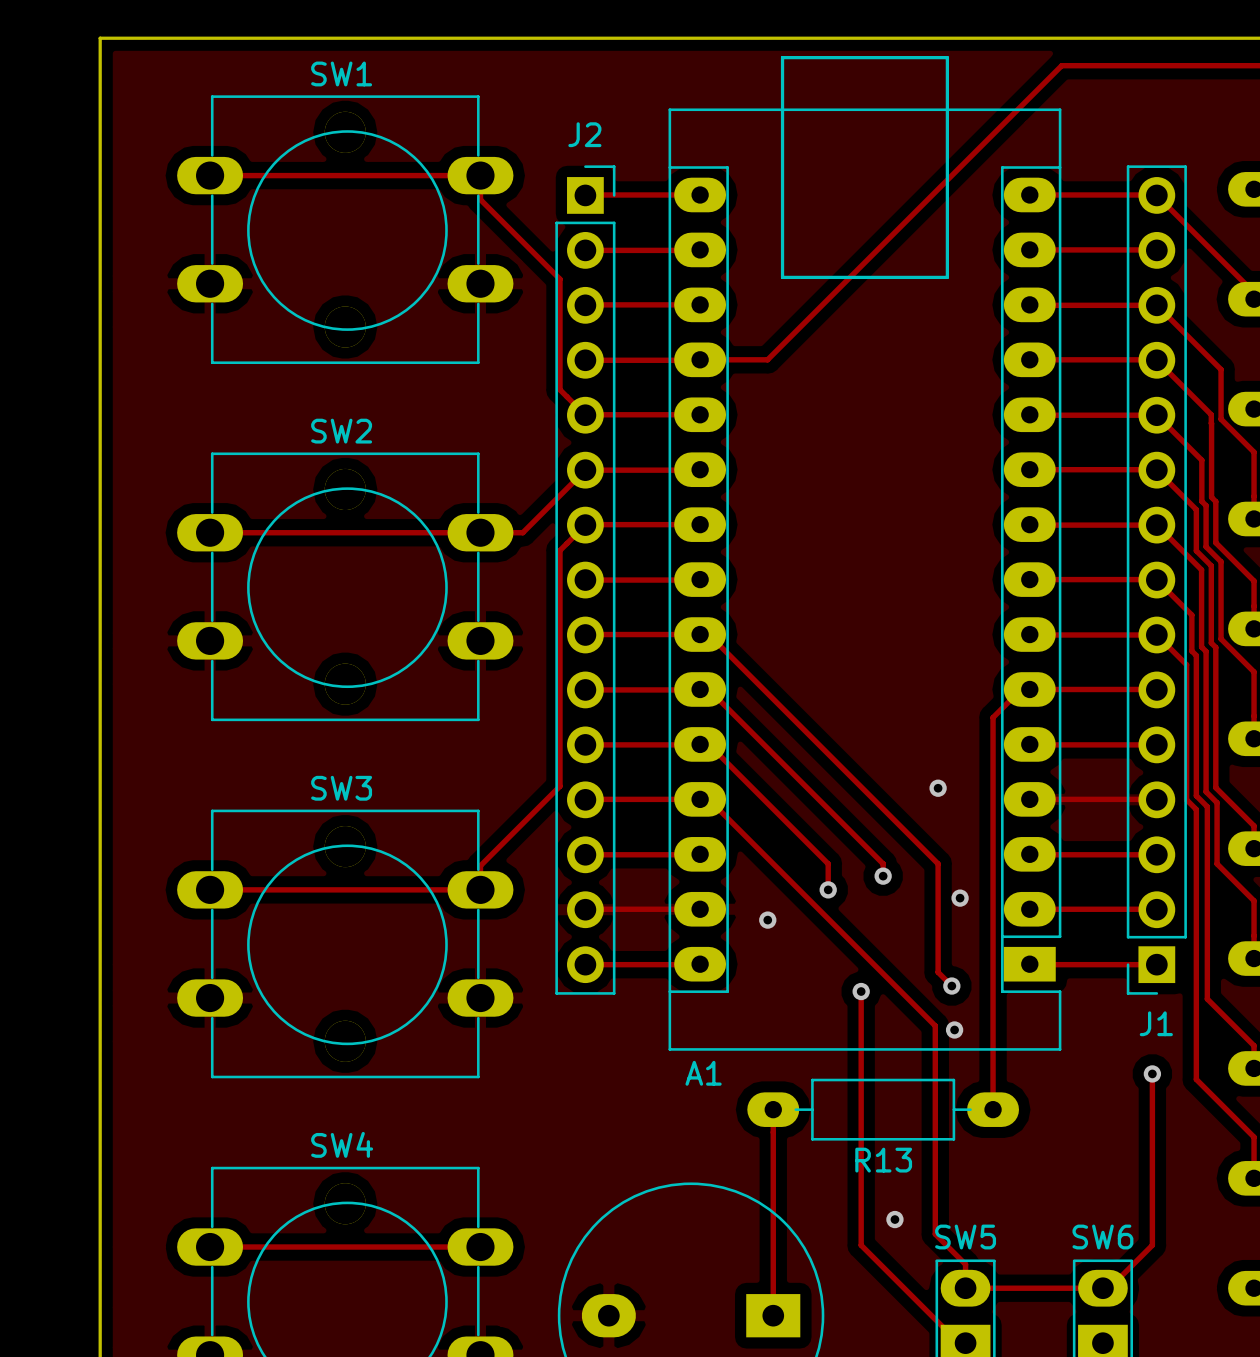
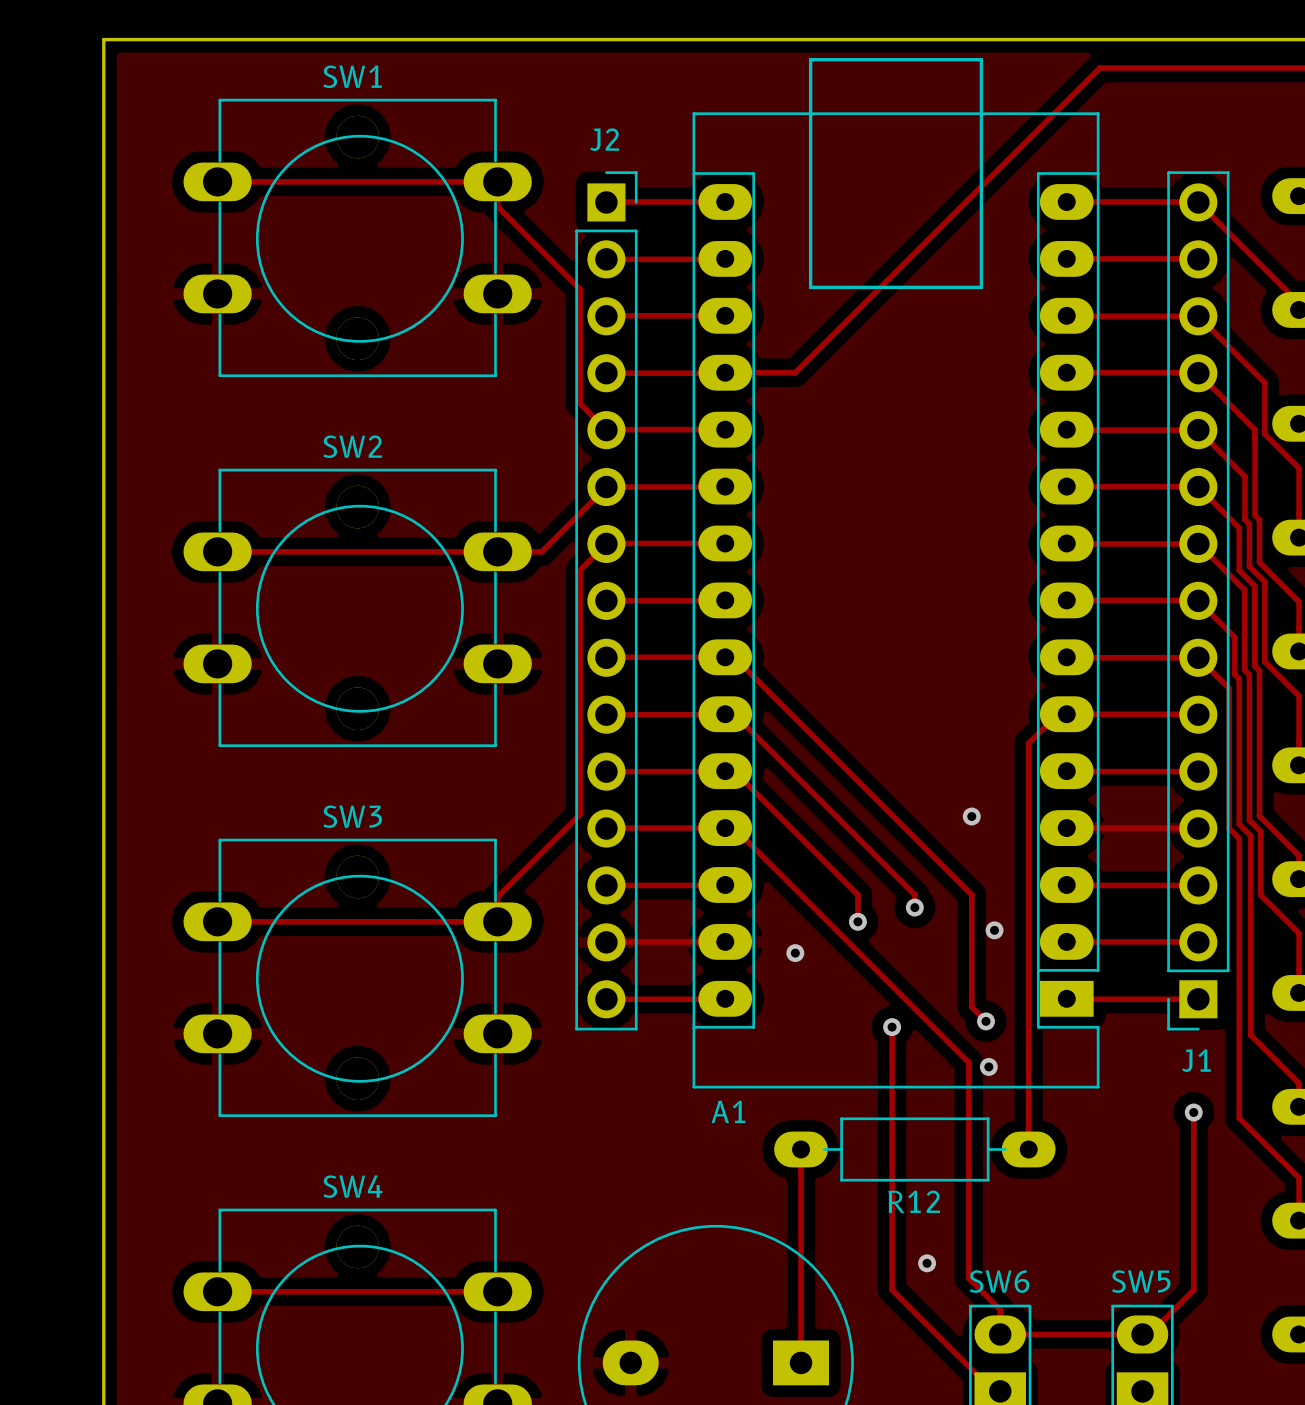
R13 name: R13 (883, 1160) -> R12 (914, 1201)
SW5 name: SW5 (965, 1237) -> SW6 (999, 1281)
SW6 name: SW6 (1102, 1237) -> SW5 (1141, 1281)

